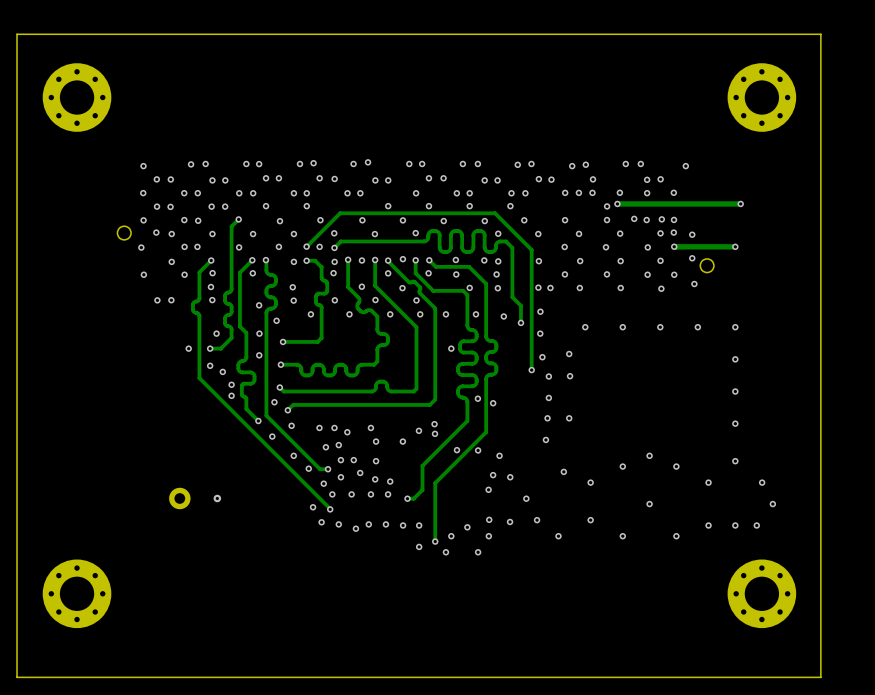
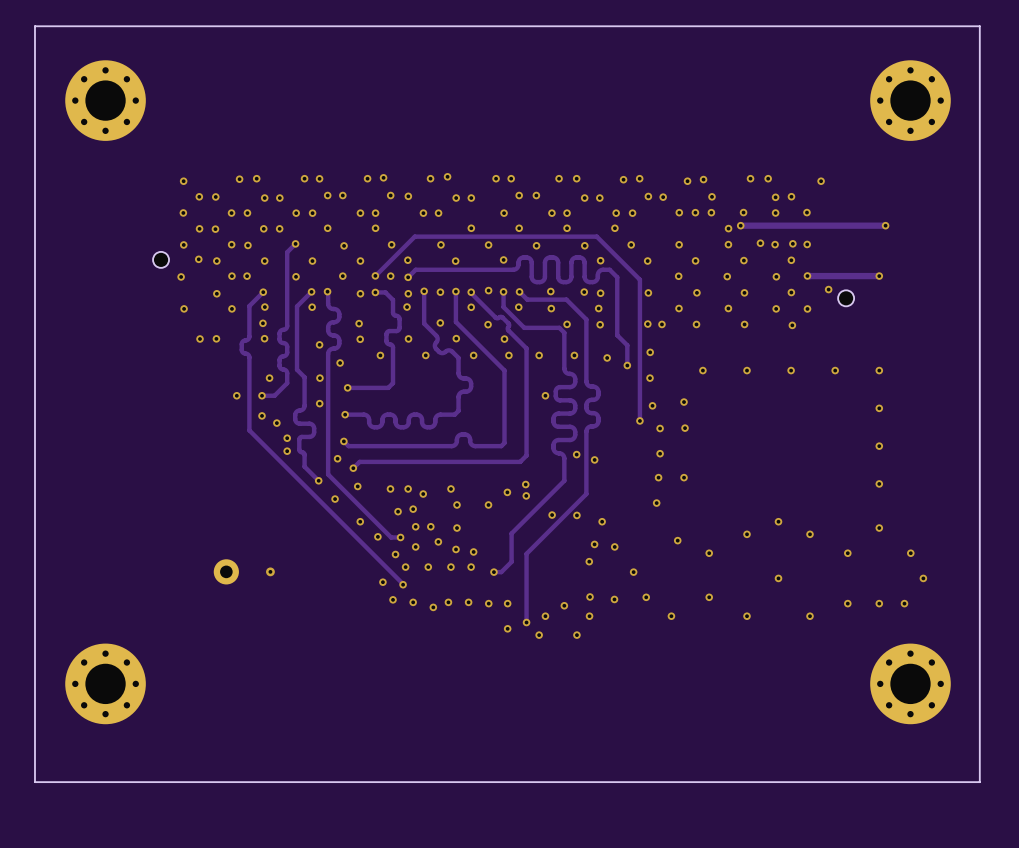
via: (673, 232) -> none
via: (692, 234) -> none
via: (694, 284) -> none

